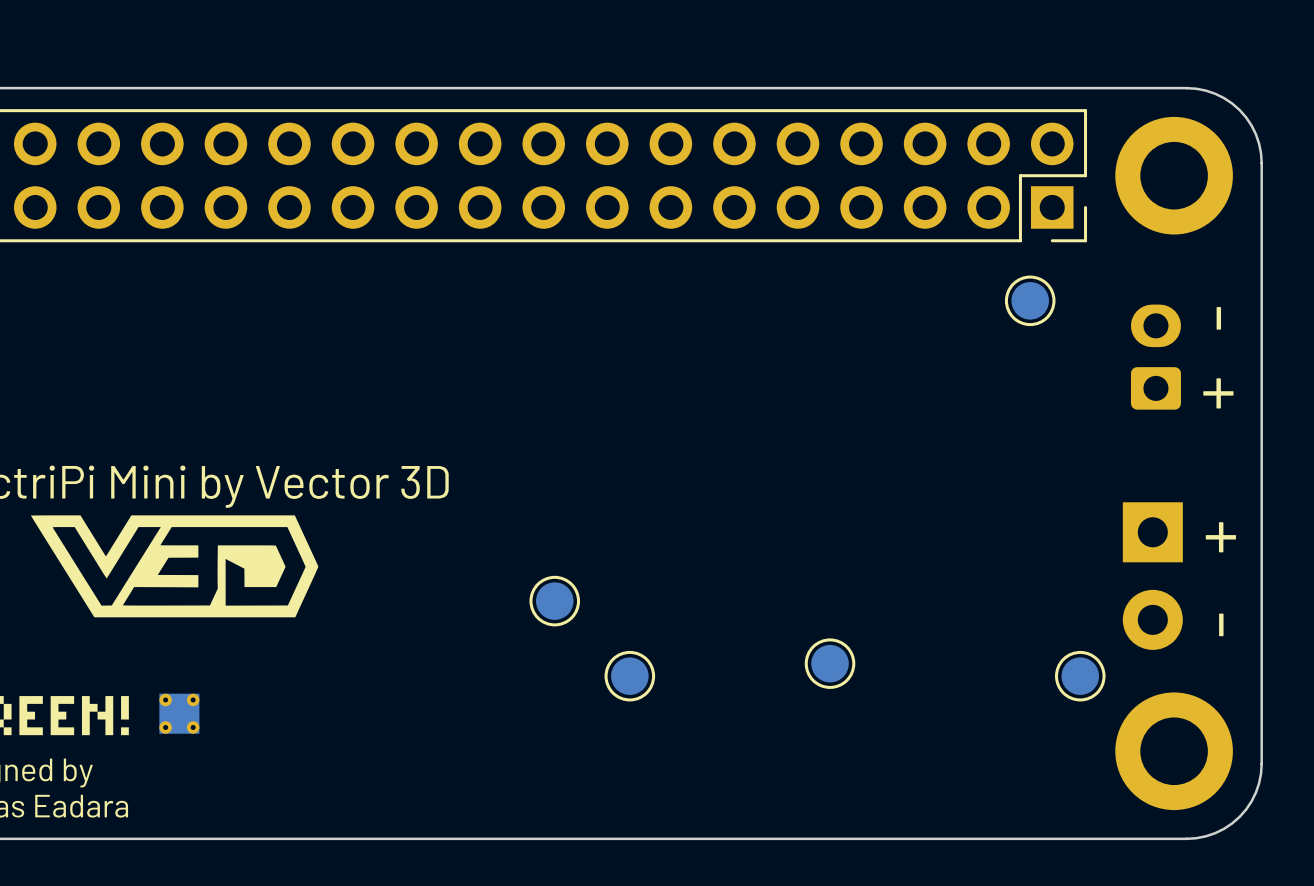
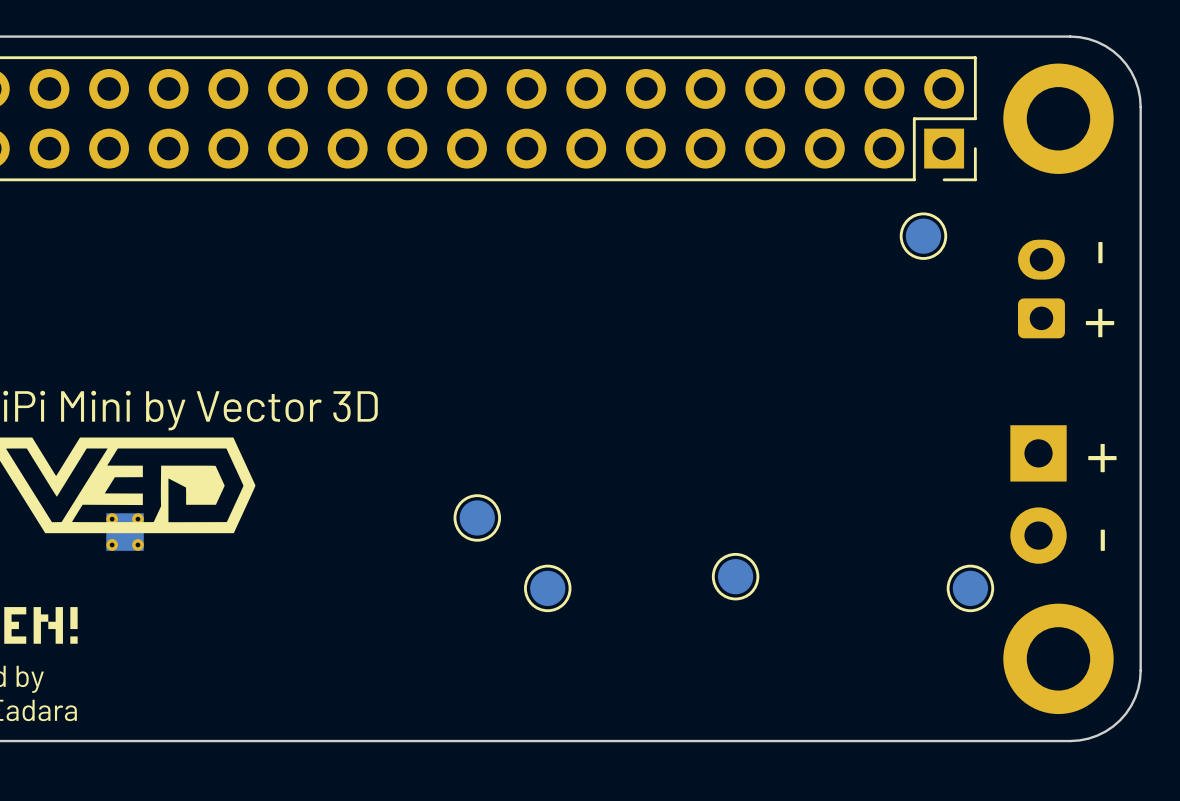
part position: (179, 713) -> (125, 532)

